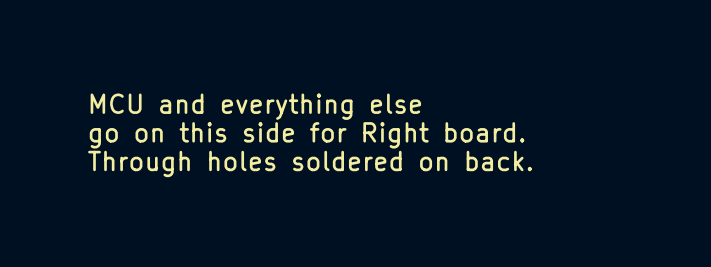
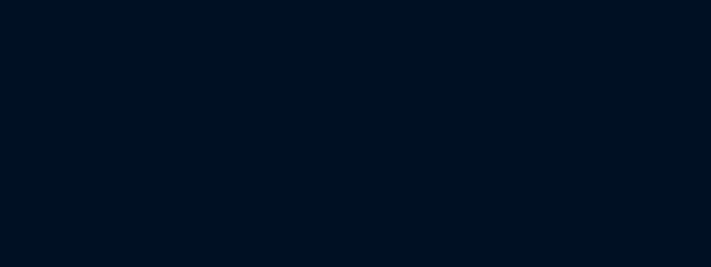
text: MCU and everything else (255, 106) -> none
text: go on this side for Right board. (307, 135) -> none
text: Through holes soldered on back. (310, 163) -> none

